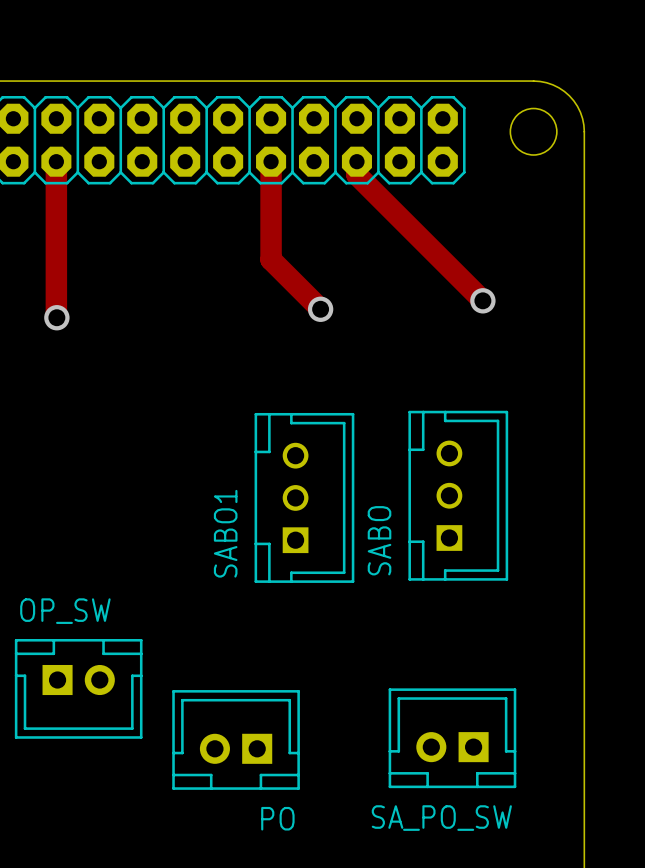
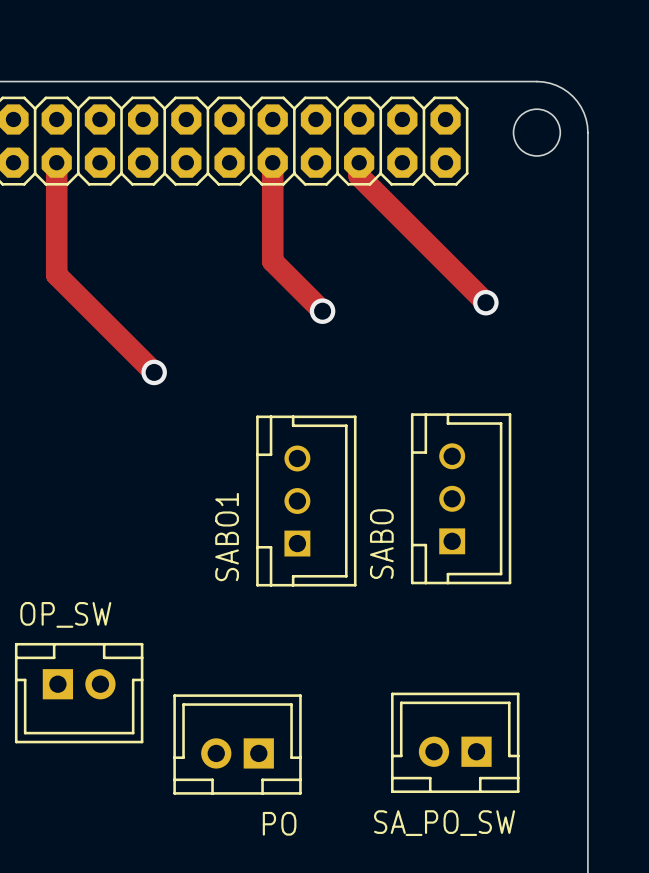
track: (56, 273) (56, 317) -> (56, 274) (154, 372)
via: (56, 317) -> none
via: none -> (154, 372)

